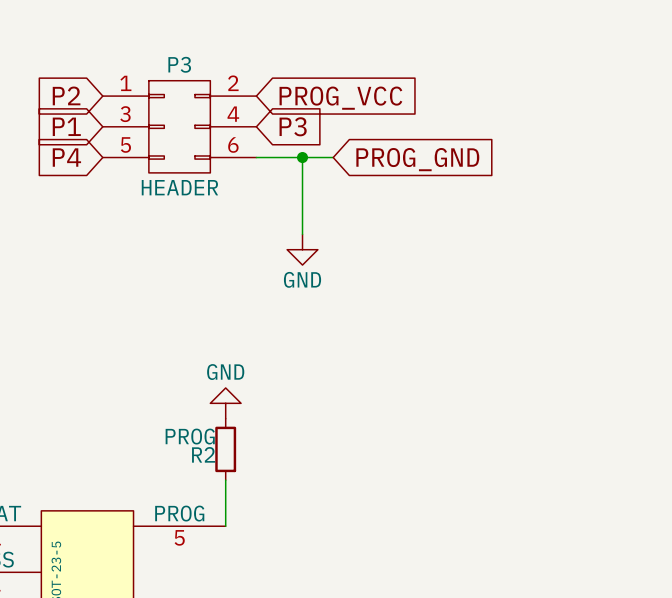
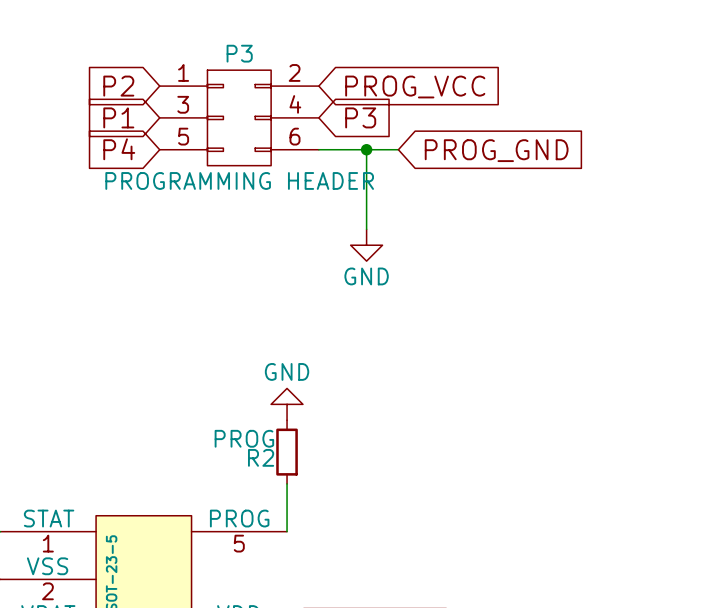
P3 value: HEADER (179, 187) -> PROGRAMMING HEADER (239, 180)

